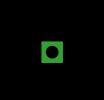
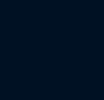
part: (52, 52) -> none

